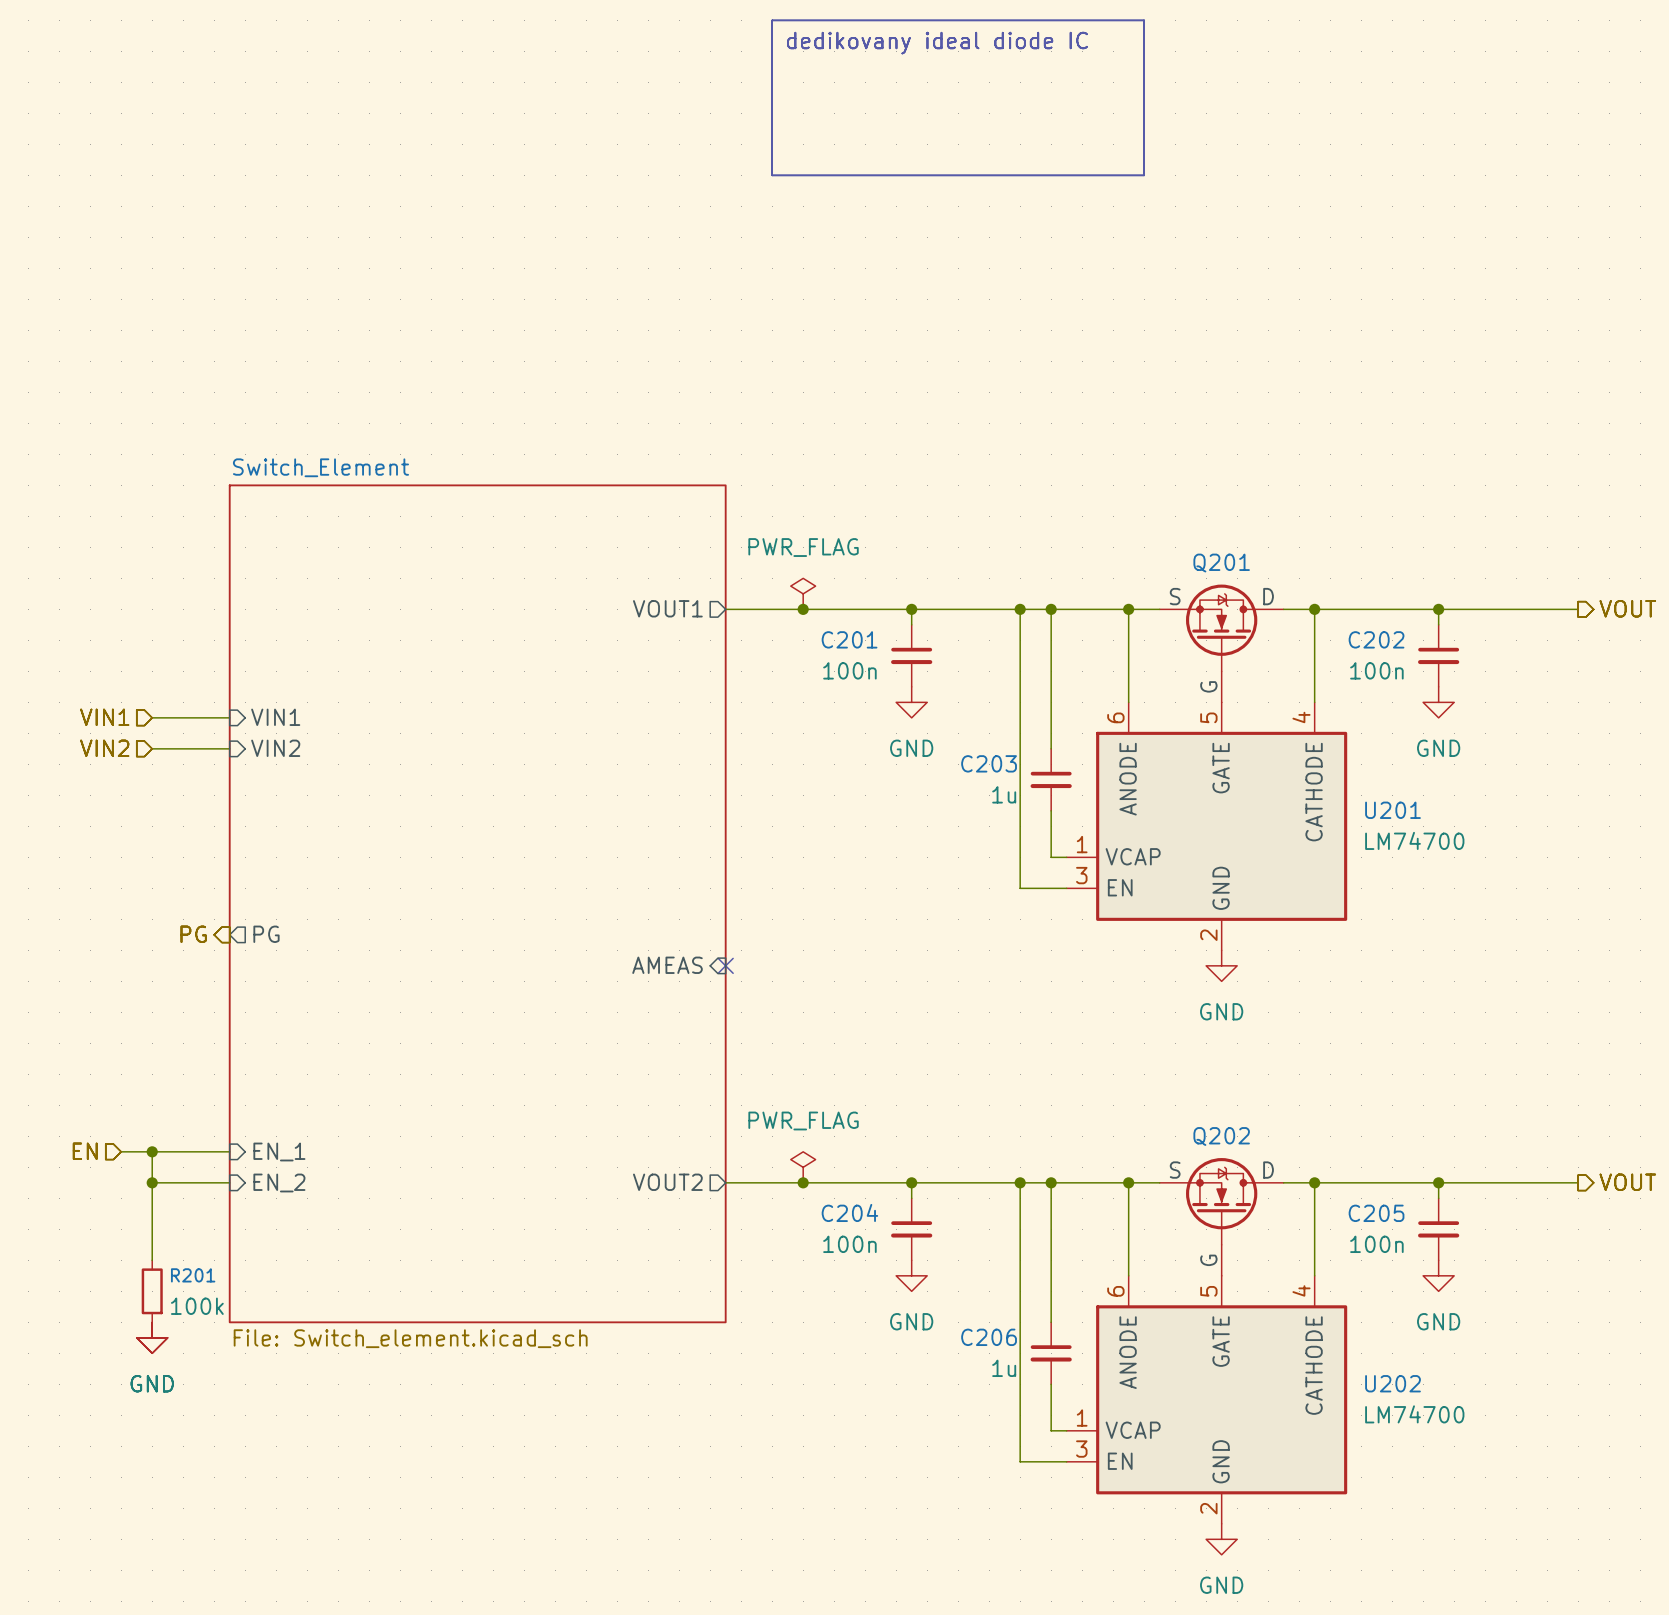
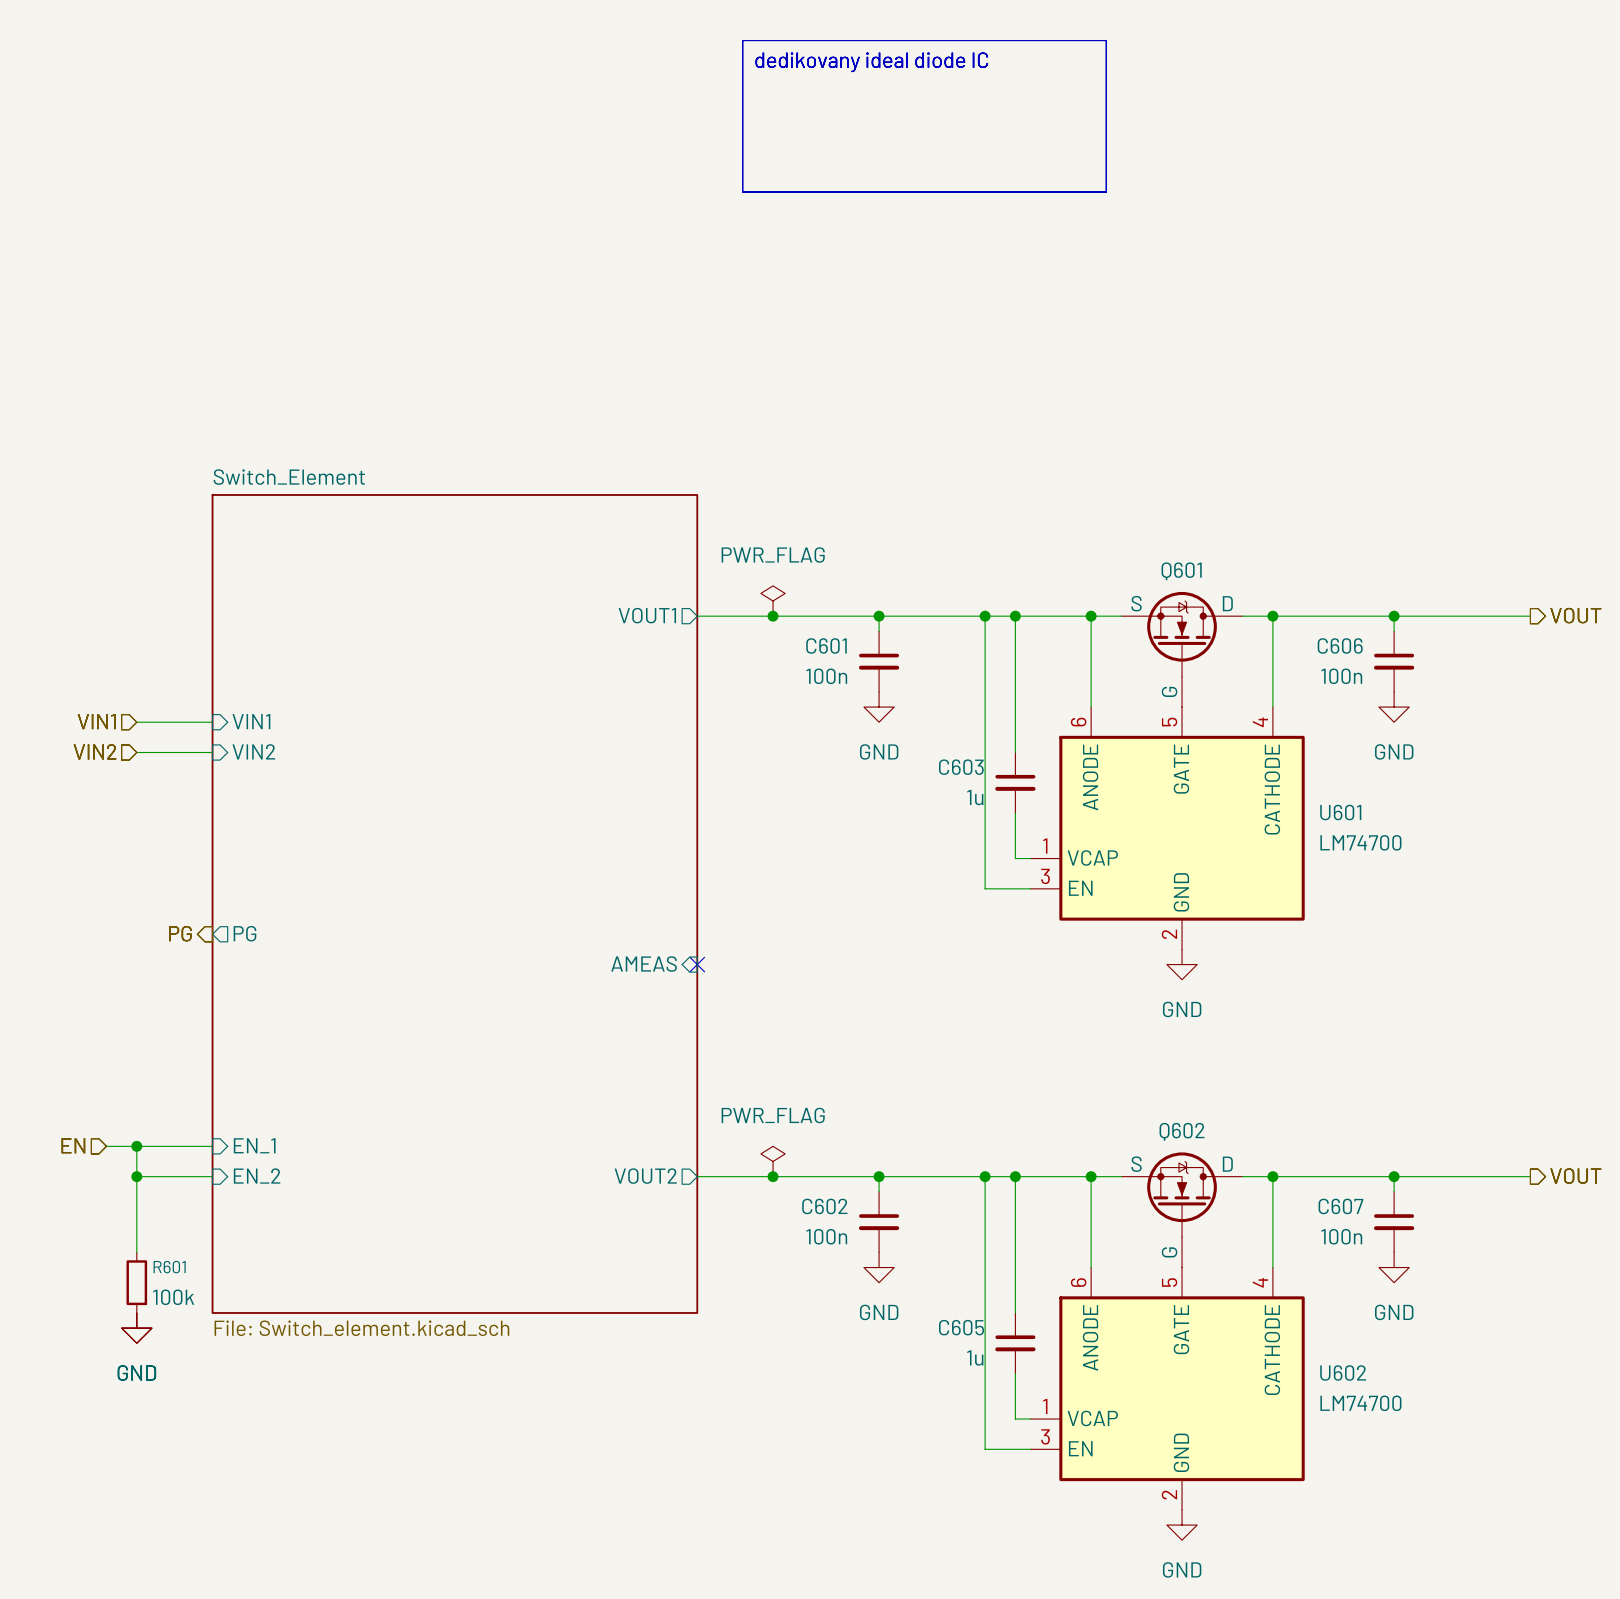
Q201 name: Q201 (1221, 563) -> Q601 (1181, 571)
C201 name: C201 (849, 639) -> C601 (826, 645)
C202 name: C202 (1376, 639) -> C606 (1340, 645)
C203 name: C203 (989, 763) -> C603 (961, 767)
U201 name: U201 (1393, 810) -> U601 (1340, 812)
Q202 name: Q202 (1221, 1136) -> Q602 (1182, 1131)
C204 name: C204 (849, 1212) -> C602 (824, 1206)
C205 name: C205 (1376, 1213) -> C607 (1340, 1206)
R201 name: R201 (193, 1275) -> R601 (169, 1267)
C206 name: C206 (989, 1337) -> C605 (961, 1327)
U202 name: U202 (1393, 1383) -> U602 (1343, 1373)

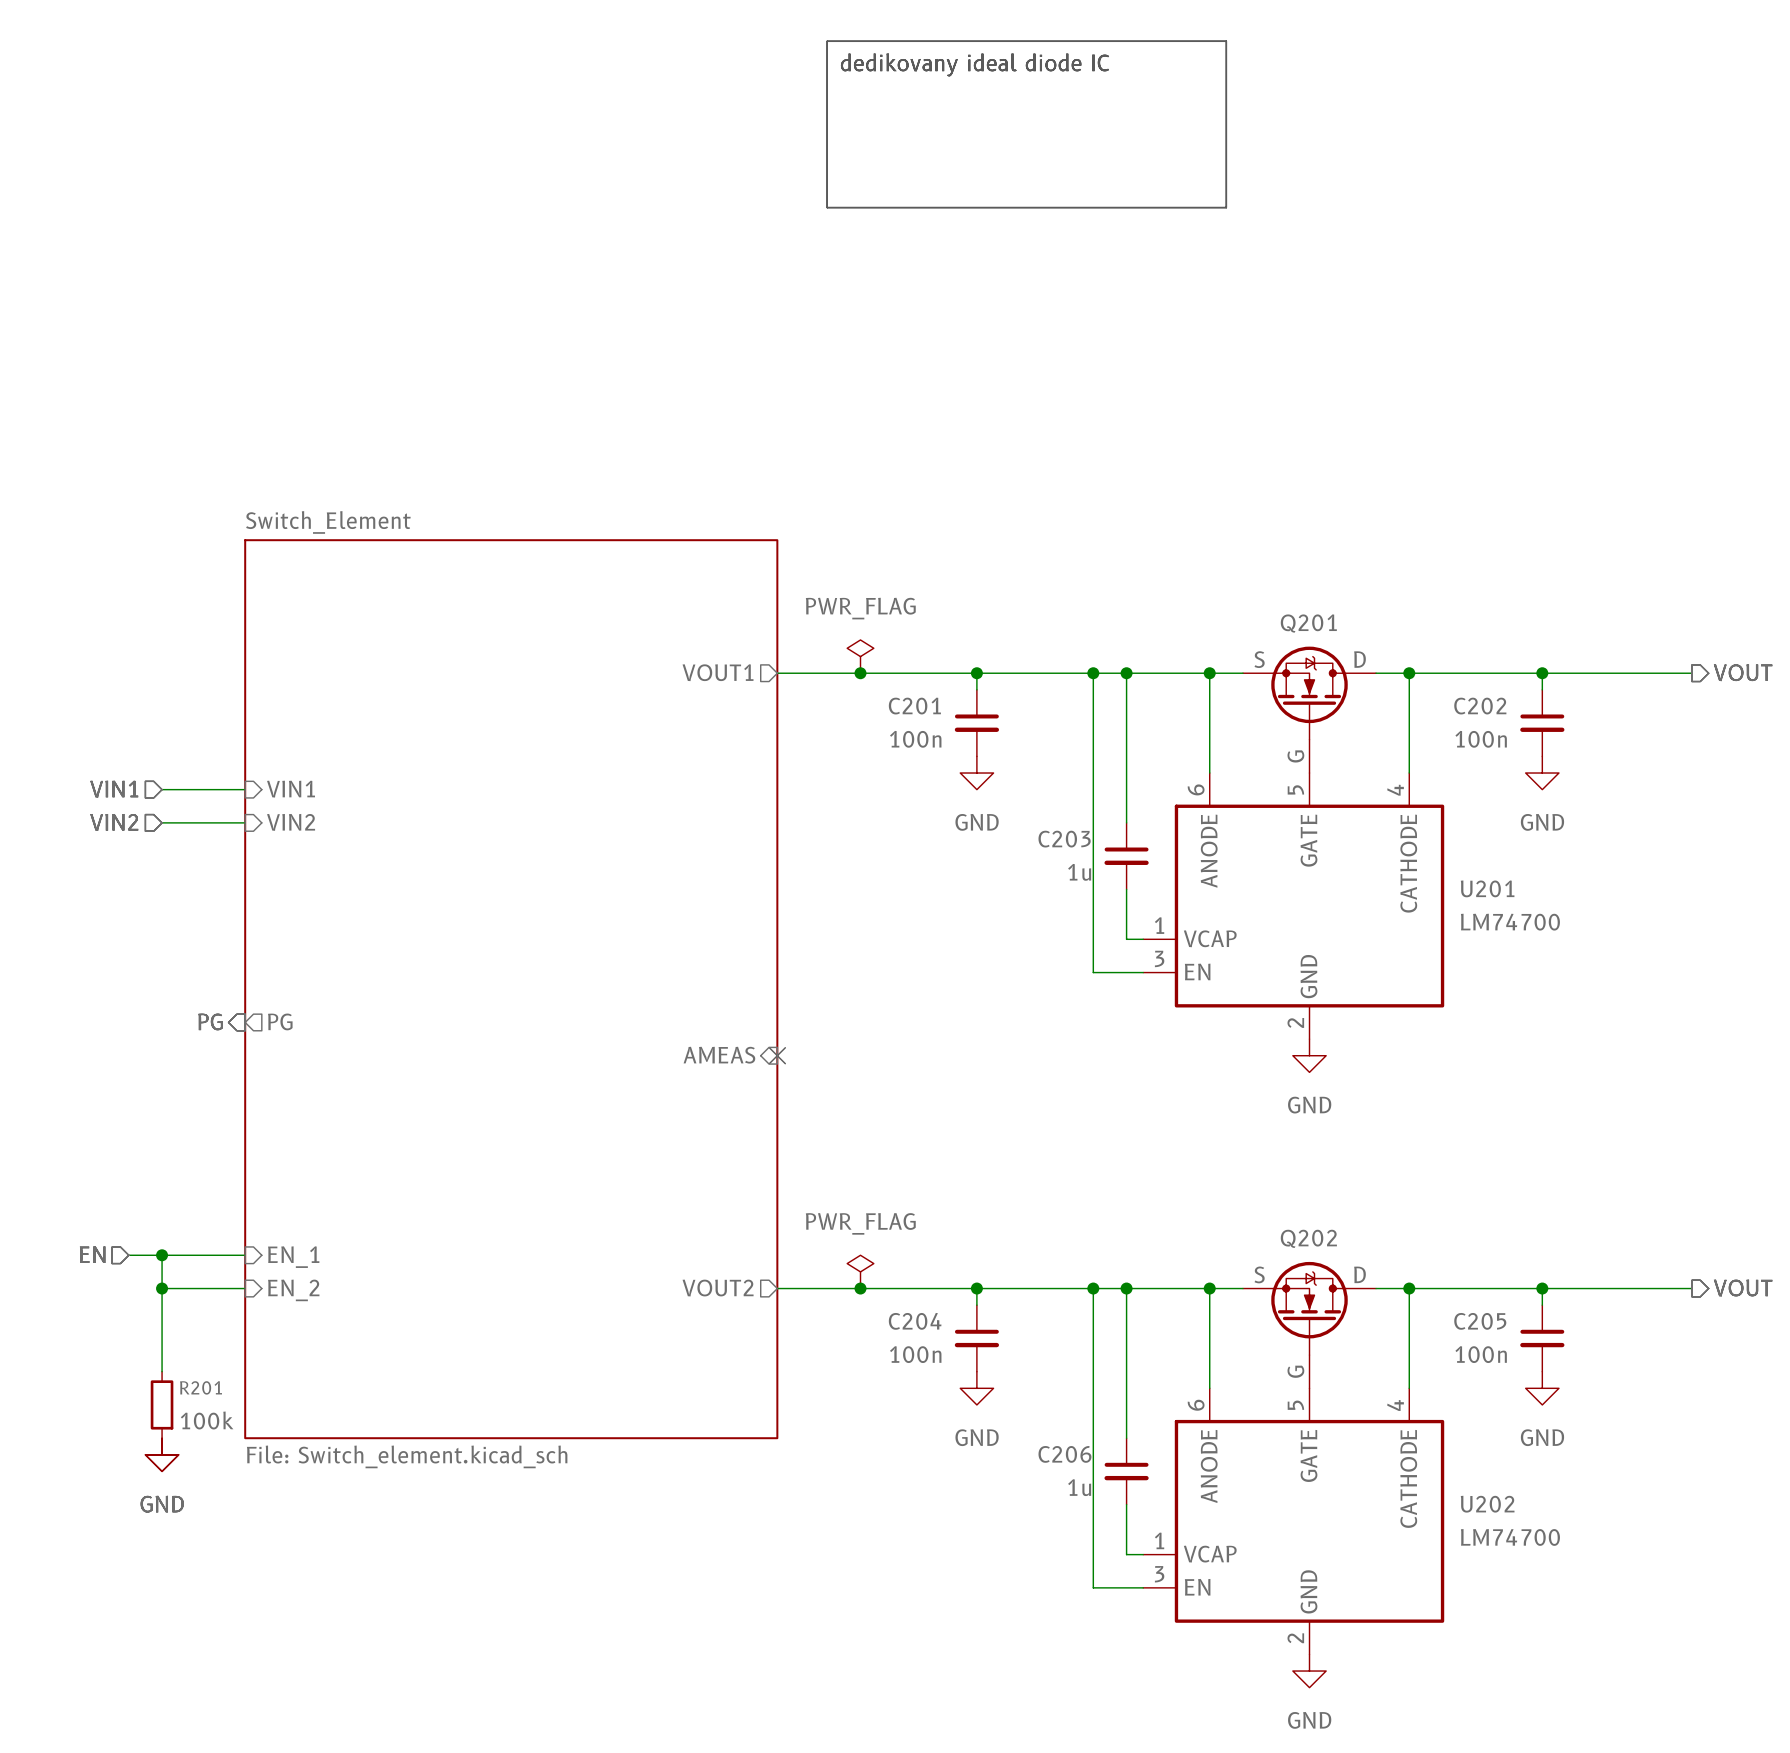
Q601 name: Q601 (1181, 571) -> Q201 (1308, 623)
C601 name: C601 (826, 645) -> C201 (914, 706)
C606 name: C606 (1340, 645) -> C202 (1480, 706)
C603 name: C603 (961, 767) -> C203 (1064, 839)
U601 name: U601 (1340, 812) -> U201 (1487, 888)
Q602 name: Q602 (1182, 1131) -> Q202 (1308, 1238)
C602 name: C602 (824, 1206) -> C204 (915, 1321)
C607 name: C607 (1340, 1206) -> C205 (1480, 1321)
R601 name: R601 (169, 1267) -> R201 (201, 1387)
C605 name: C605 (961, 1327) -> C206 (1064, 1454)
U602 name: U602 (1343, 1373) -> U202 (1487, 1504)

